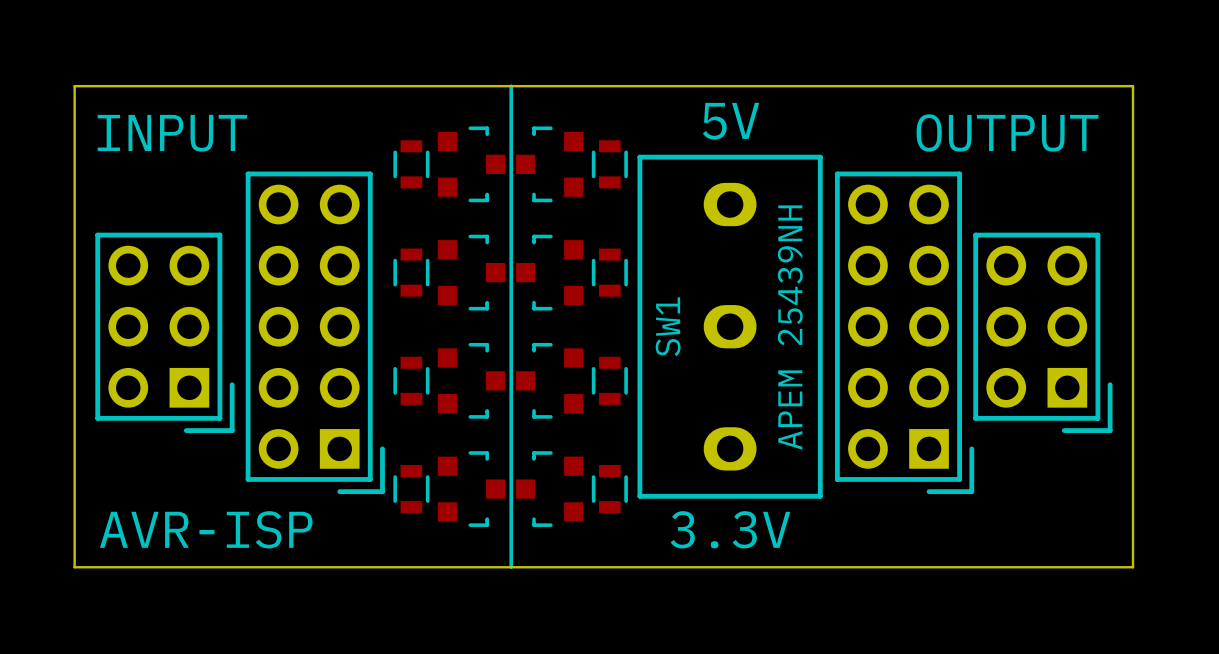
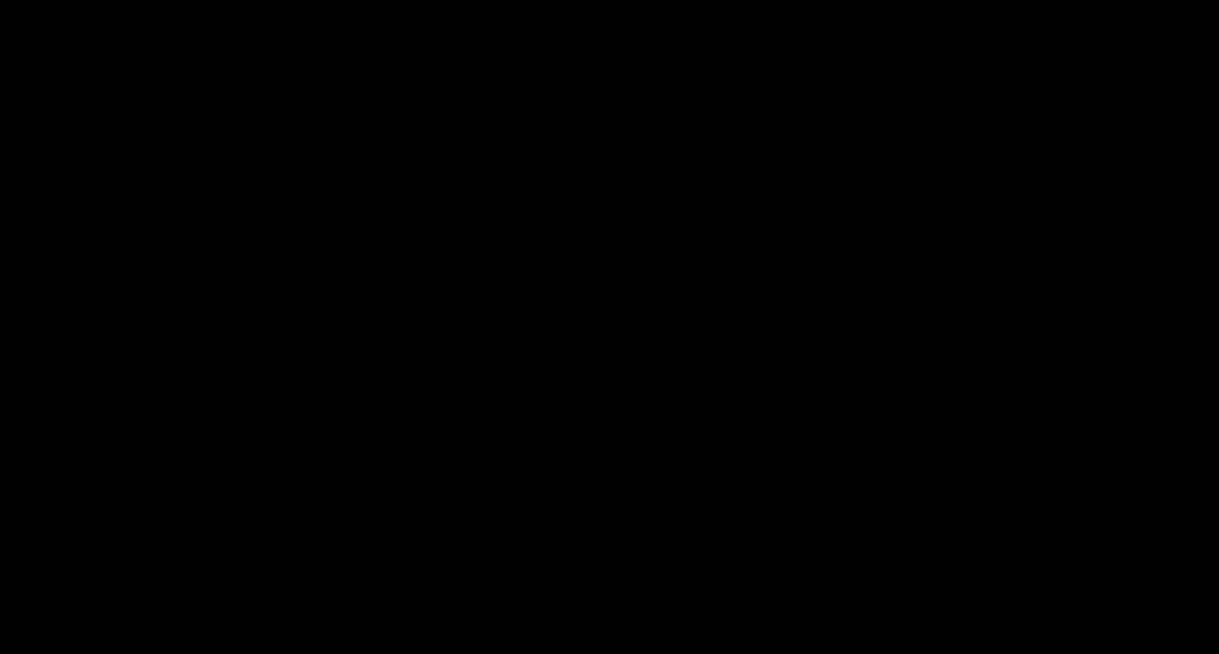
board edge: (74, 86) (74, 567) (1133, 567) (1133, 86) (74, 86) -> none
line: (511, 86) (511, 567) -> none
text: 5V (731, 121) -> none
text: OUTPUT (1007, 132) -> none
text: INPUT (172, 133) -> none
part: (411, 164) -> none
part: (471, 164) -> none
part: (549, 164) -> none
part: (609, 164) -> none
part: (411, 272) -> none
part: (471, 272) -> none
part: (549, 272) -> none
part: (609, 272) -> none
SW1: APEM 25439NH (730, 326) -> none
part: (164, 332) -> none
part: (315, 332) -> none
part: (904, 332) -> none
part: (1042, 332) -> none
part: (411, 380) -> none
part: (471, 380) -> none
part: (549, 380) -> none
part: (609, 380) -> none
part: (411, 489) -> none
part: (471, 489) -> none
part: (549, 489) -> none
part: (609, 489) -> none
text: AVR-ISP (206, 529) -> none
text: 3.3V (730, 529) -> none

